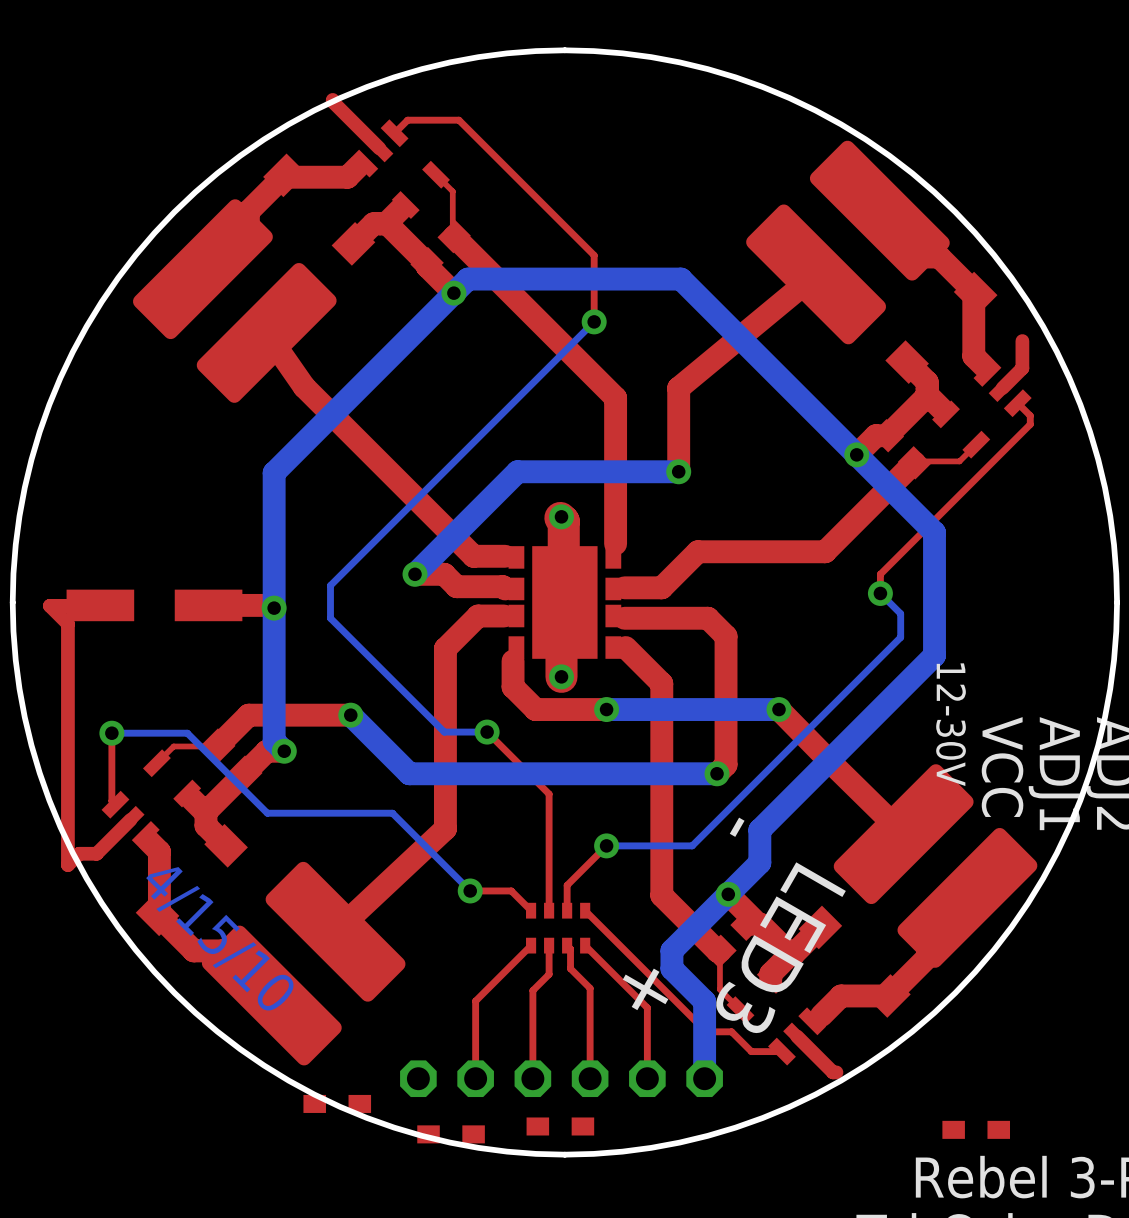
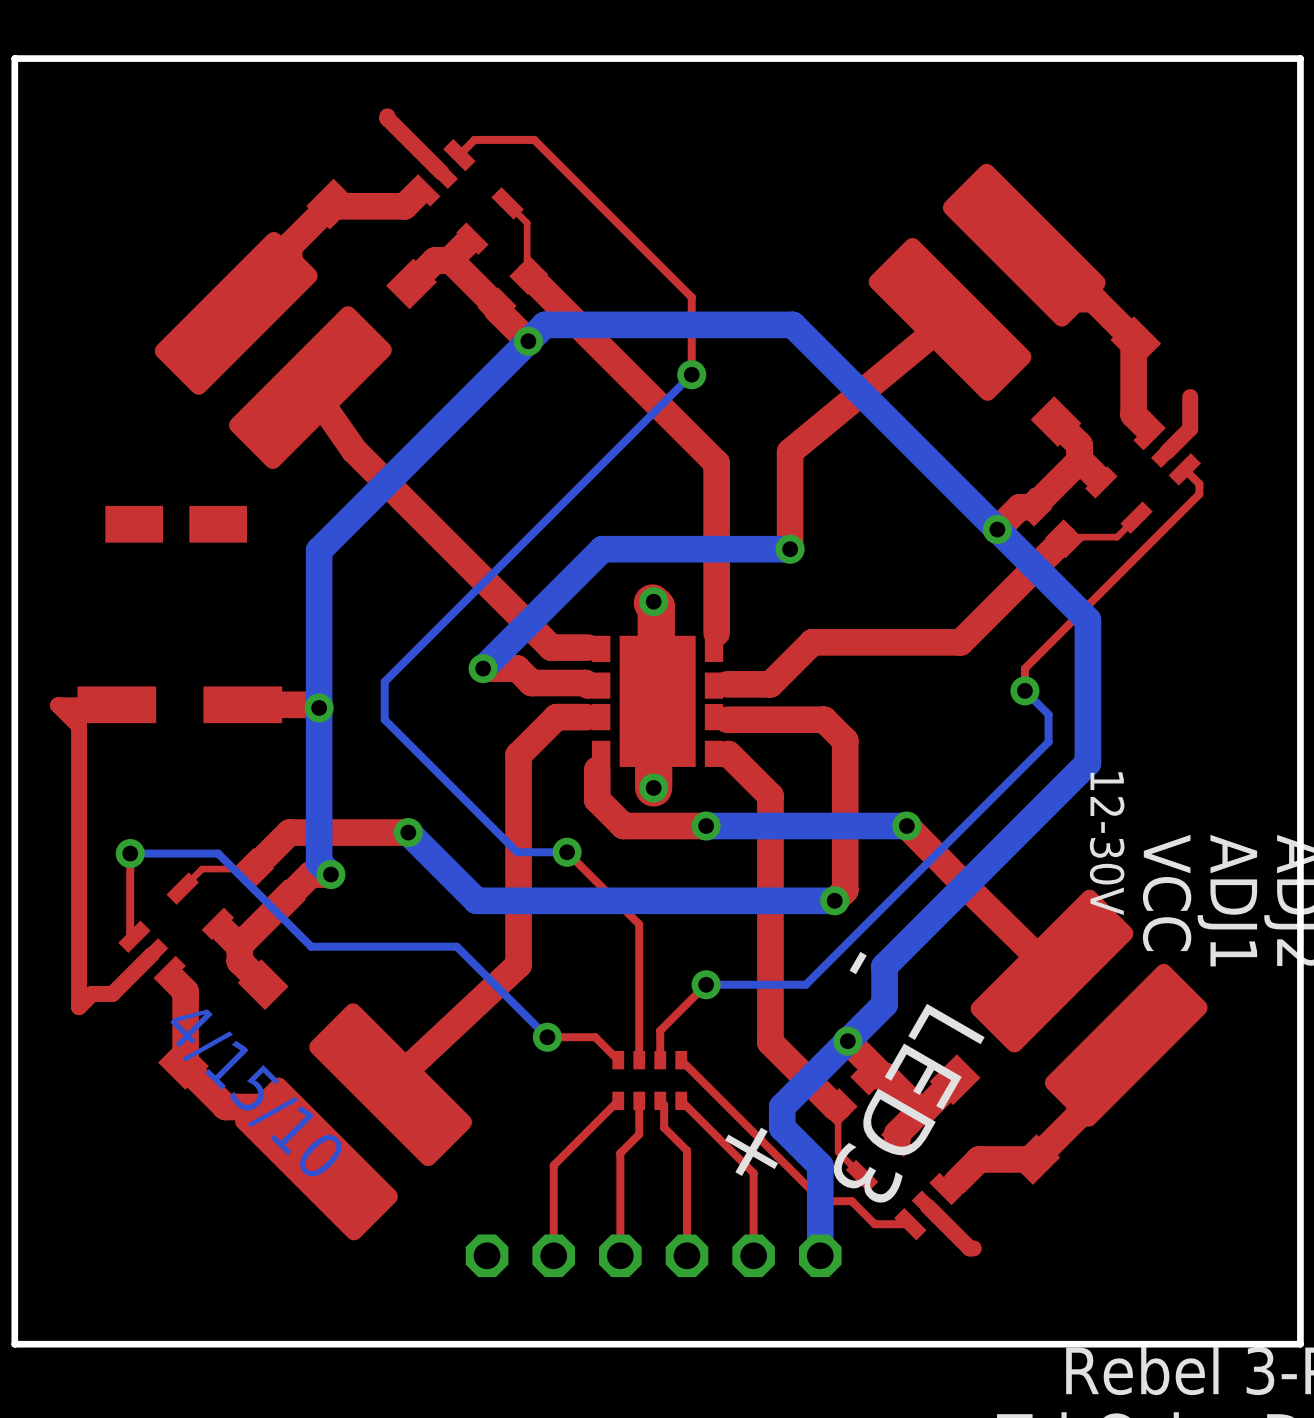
board edge: (564, 50) (622, 53) (679, 62) (735, 77) (789, 98) (815, 110) (865, 139) (912, 173) (955, 212) (994, 254) (1027, 301) (1056, 351) (1069, 377) (1090, 431) (1104, 487) (1114, 544) (1117, 602) (1114, 660) (1104, 717) (1090, 773) (1069, 827) (1056, 853) (1027, 903) (994, 949) (955, 992) (912, 1031) (865, 1065) (815, 1094) (789, 1106) (735, 1127) (679, 1142) (622, 1151) (564, 1154) (507, 1151) (450, 1142) (394, 1127) (340, 1106) (314, 1094) (264, 1065) (217, 1031) (174, 992) (135, 949) (101, 903) (72, 853) (60, 827) (39, 773) (24, 717) (15, 660) (12, 602) (15, 544) (24, 487) (39, 431) (60, 377) (72, 351) (101, 301) (135, 254) (174, 212) (217, 173) (264, 139) (314, 110) (340, 98) (394, 77) (450, 62) (507, 53) (564, 50) -> (1300, 58) (1300, 1344) (14, 1344) (14, 58) (1300, 58)
part: none -> (176, 524)
part: (337, 1103) -> none
part: (560, 1126) -> none
part: (976, 1129) -> none
part: (451, 1134) -> none

